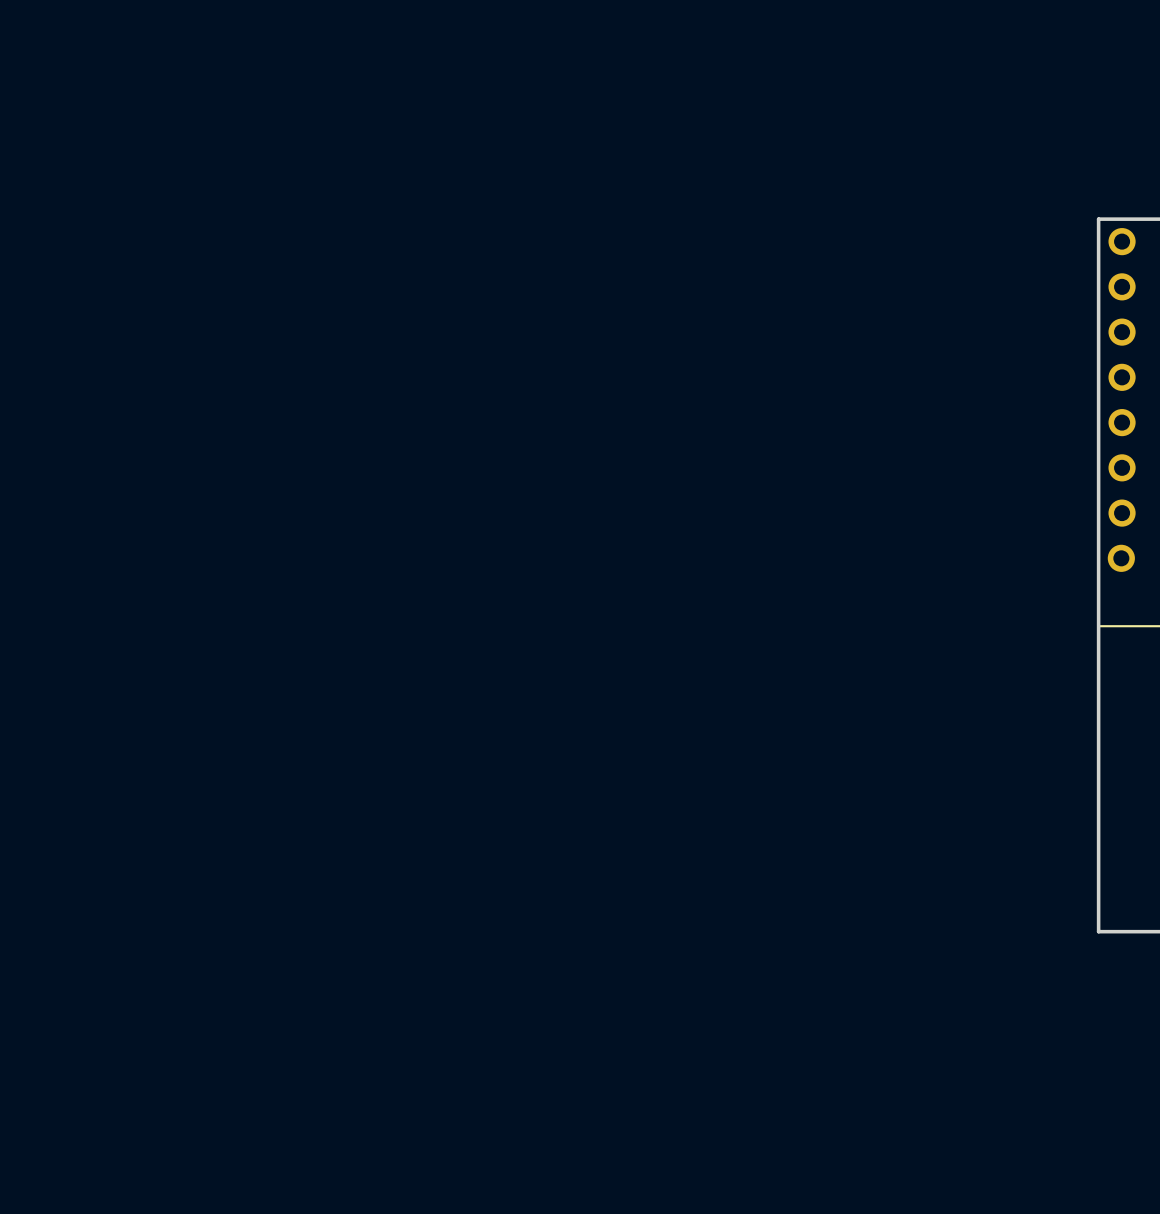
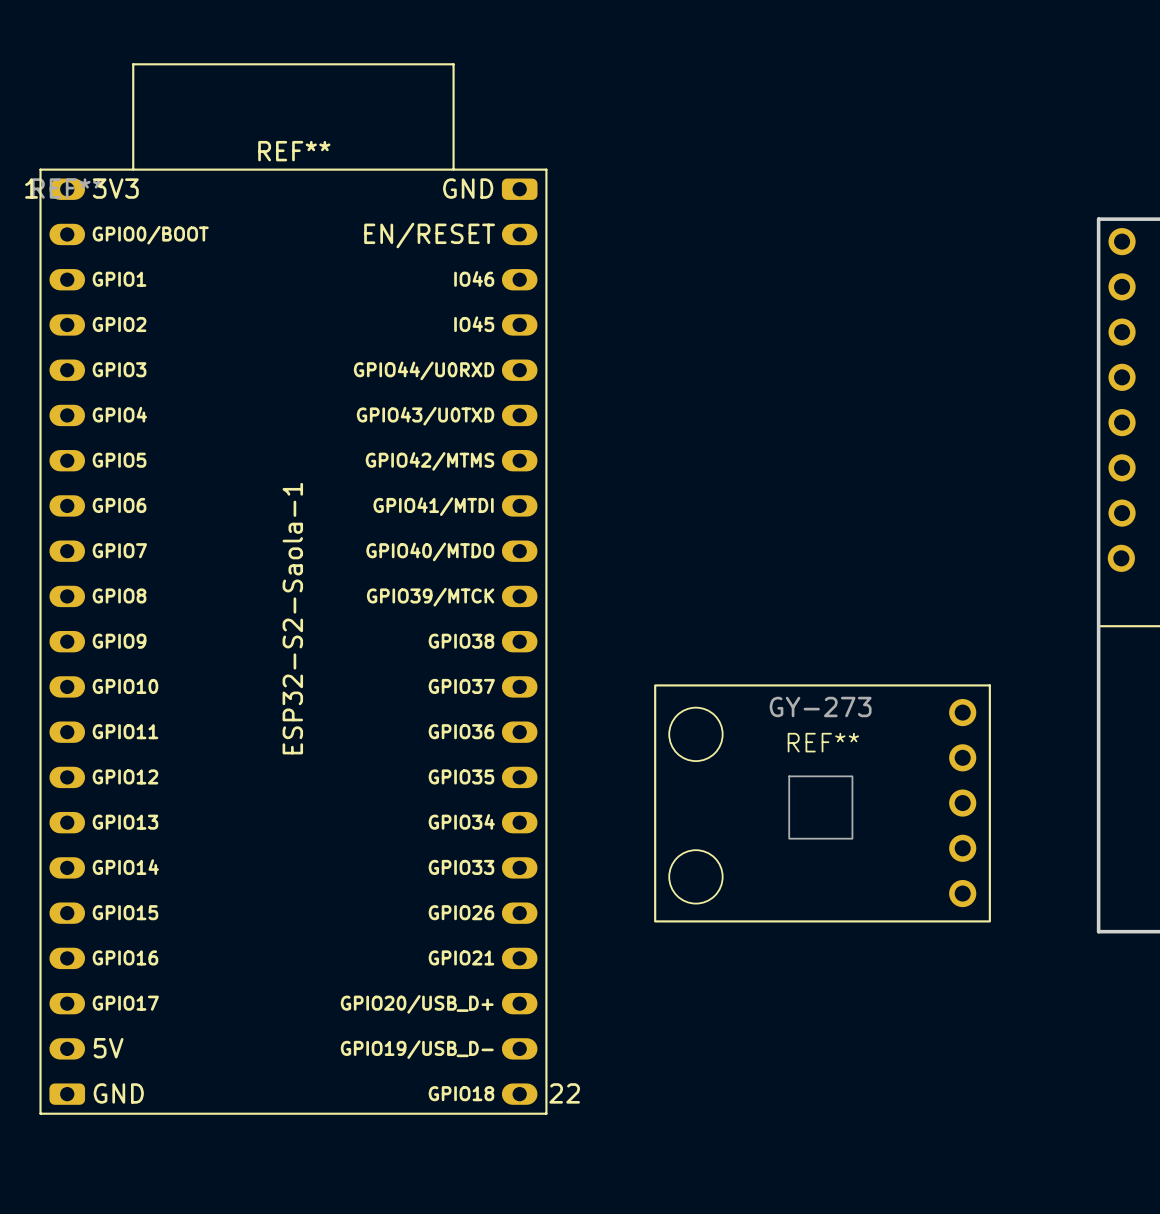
REF**: none -> ESP32-S2-Saola-1 (293, 589)
REF**: none -> GY-273 (822, 803)

